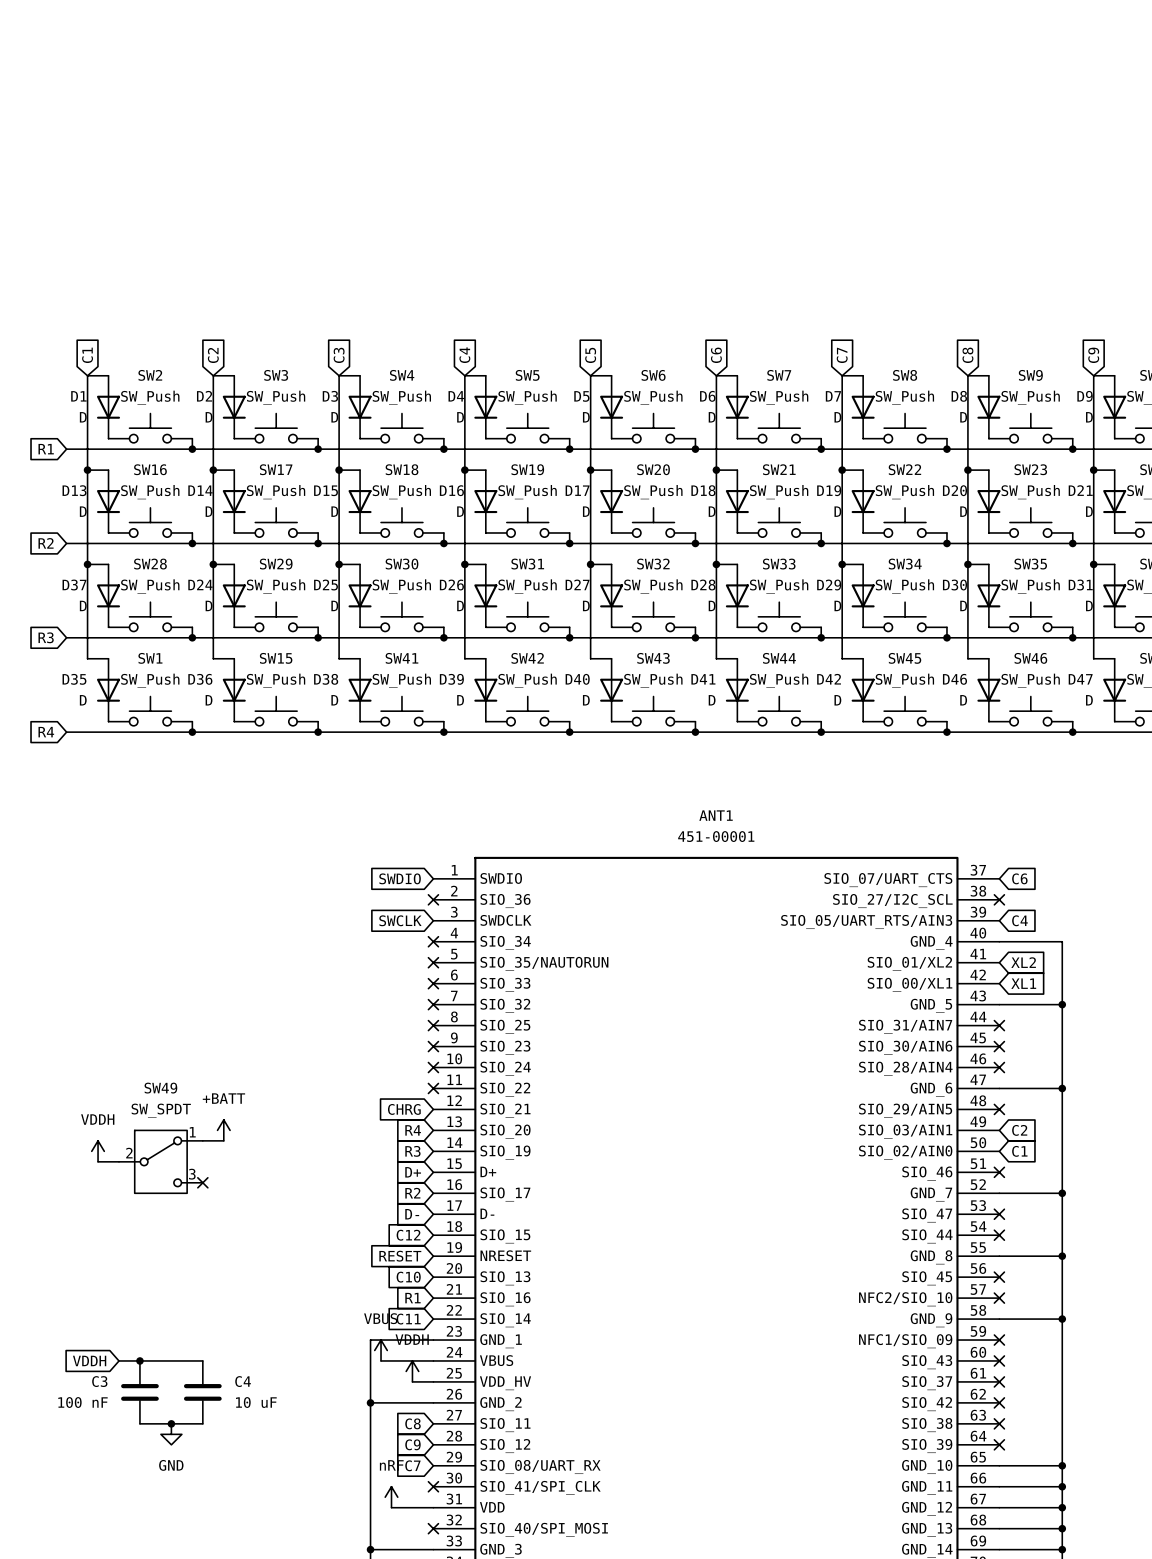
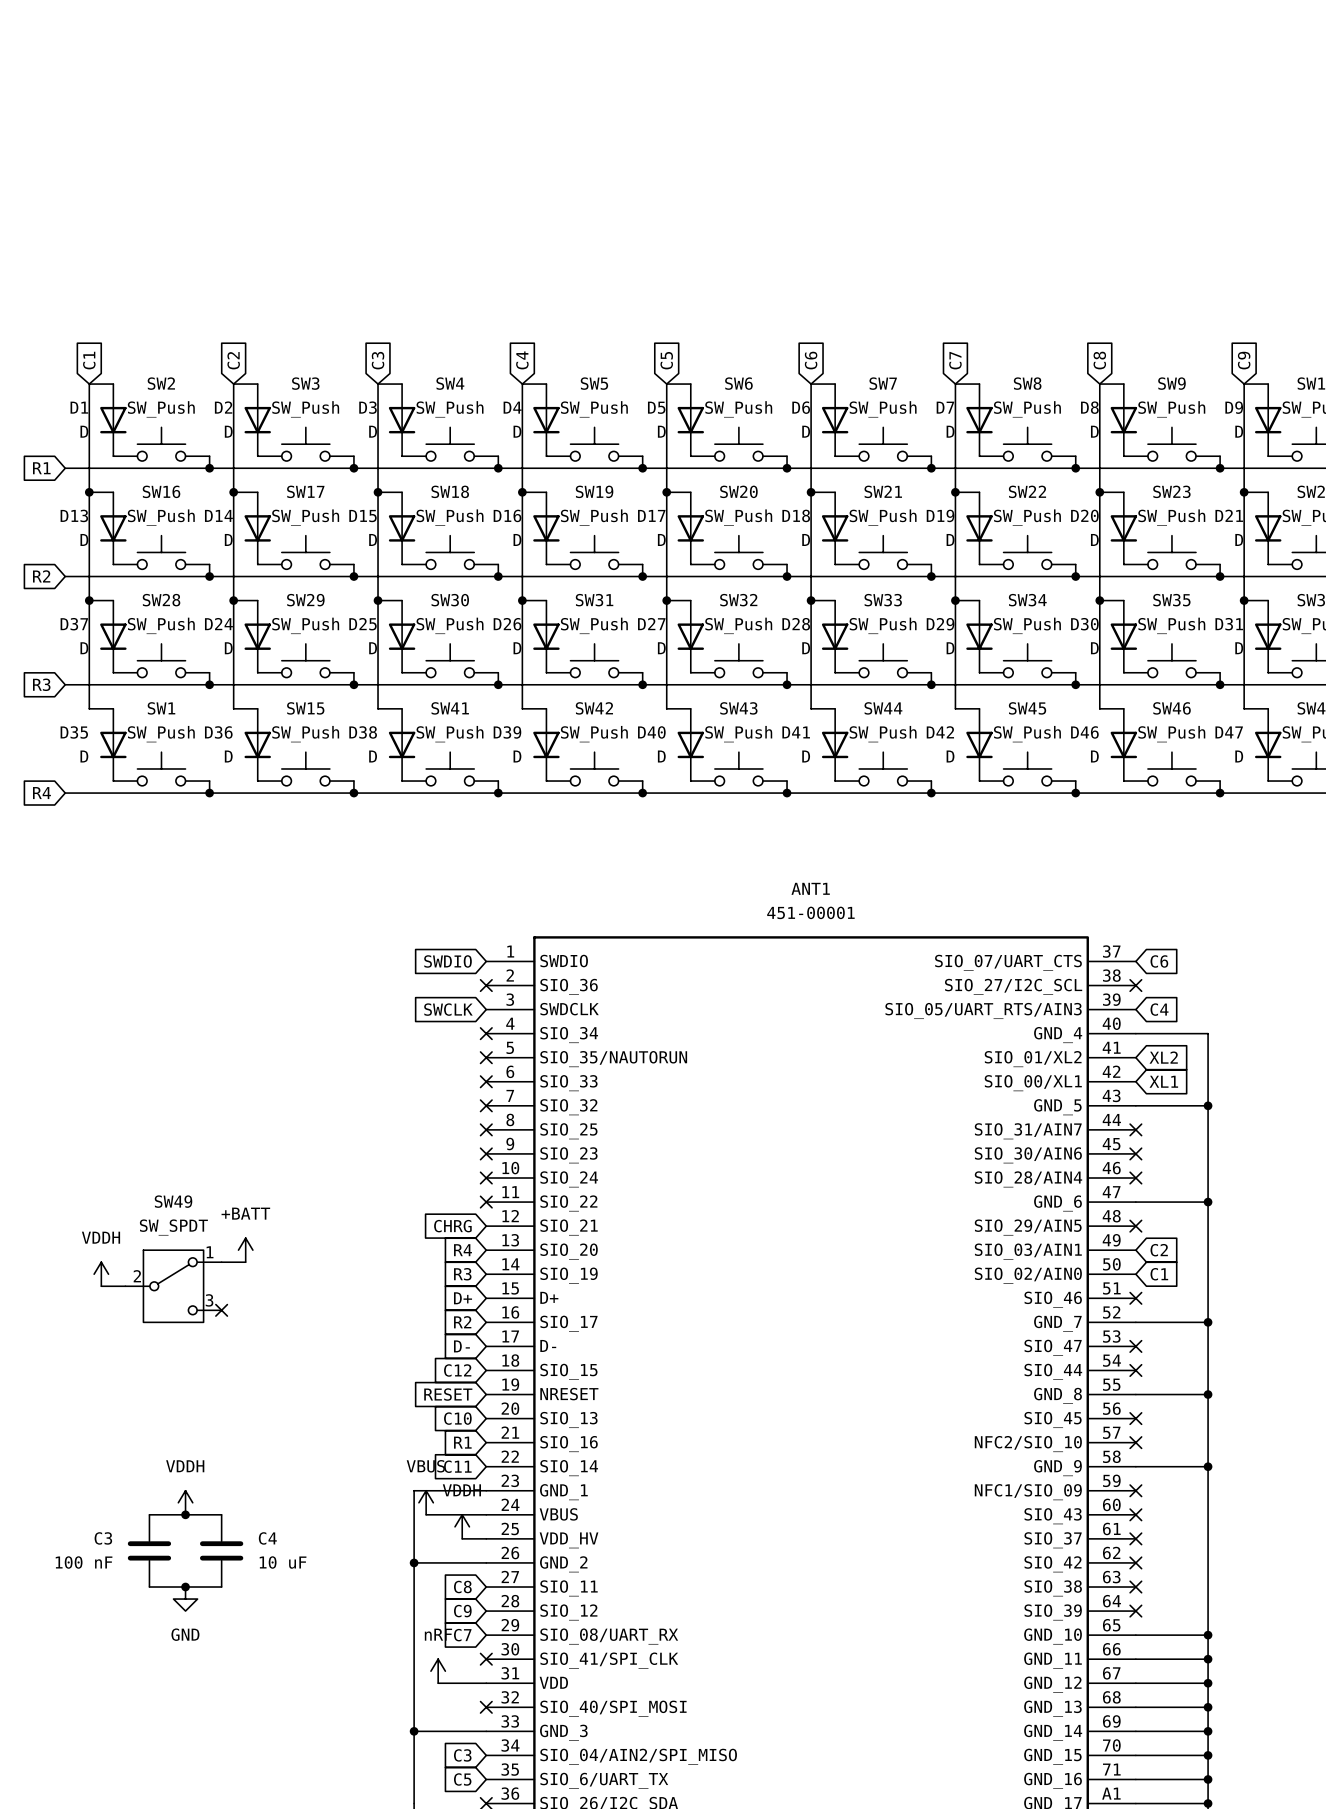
power symbol: none -> VDDH (185, 1502)
global label: VDDH (89, 1360) -> none
wire: (118, 1360) (139, 1360) -> none
junction position: (139, 1360) -> (185, 1514)

